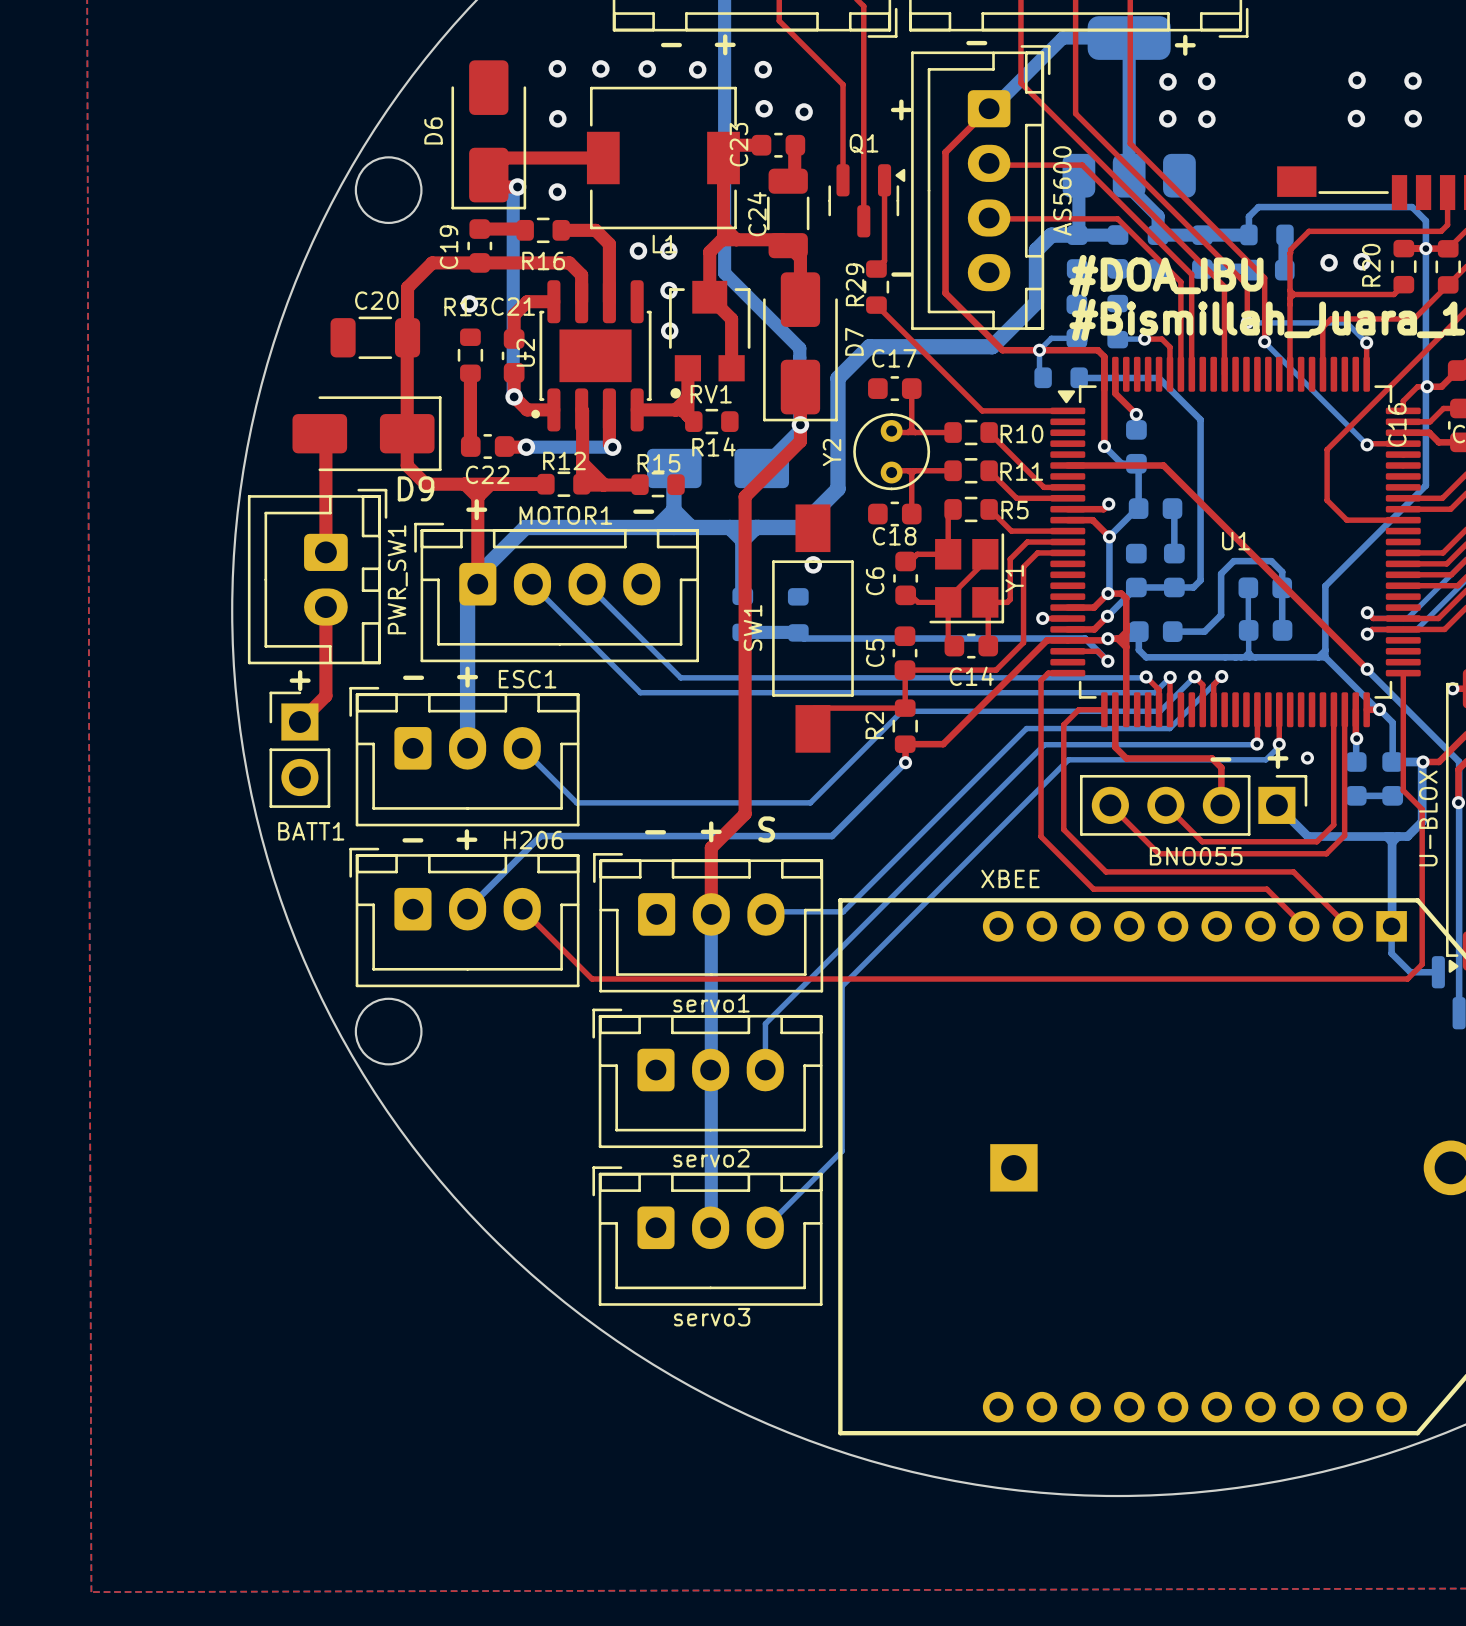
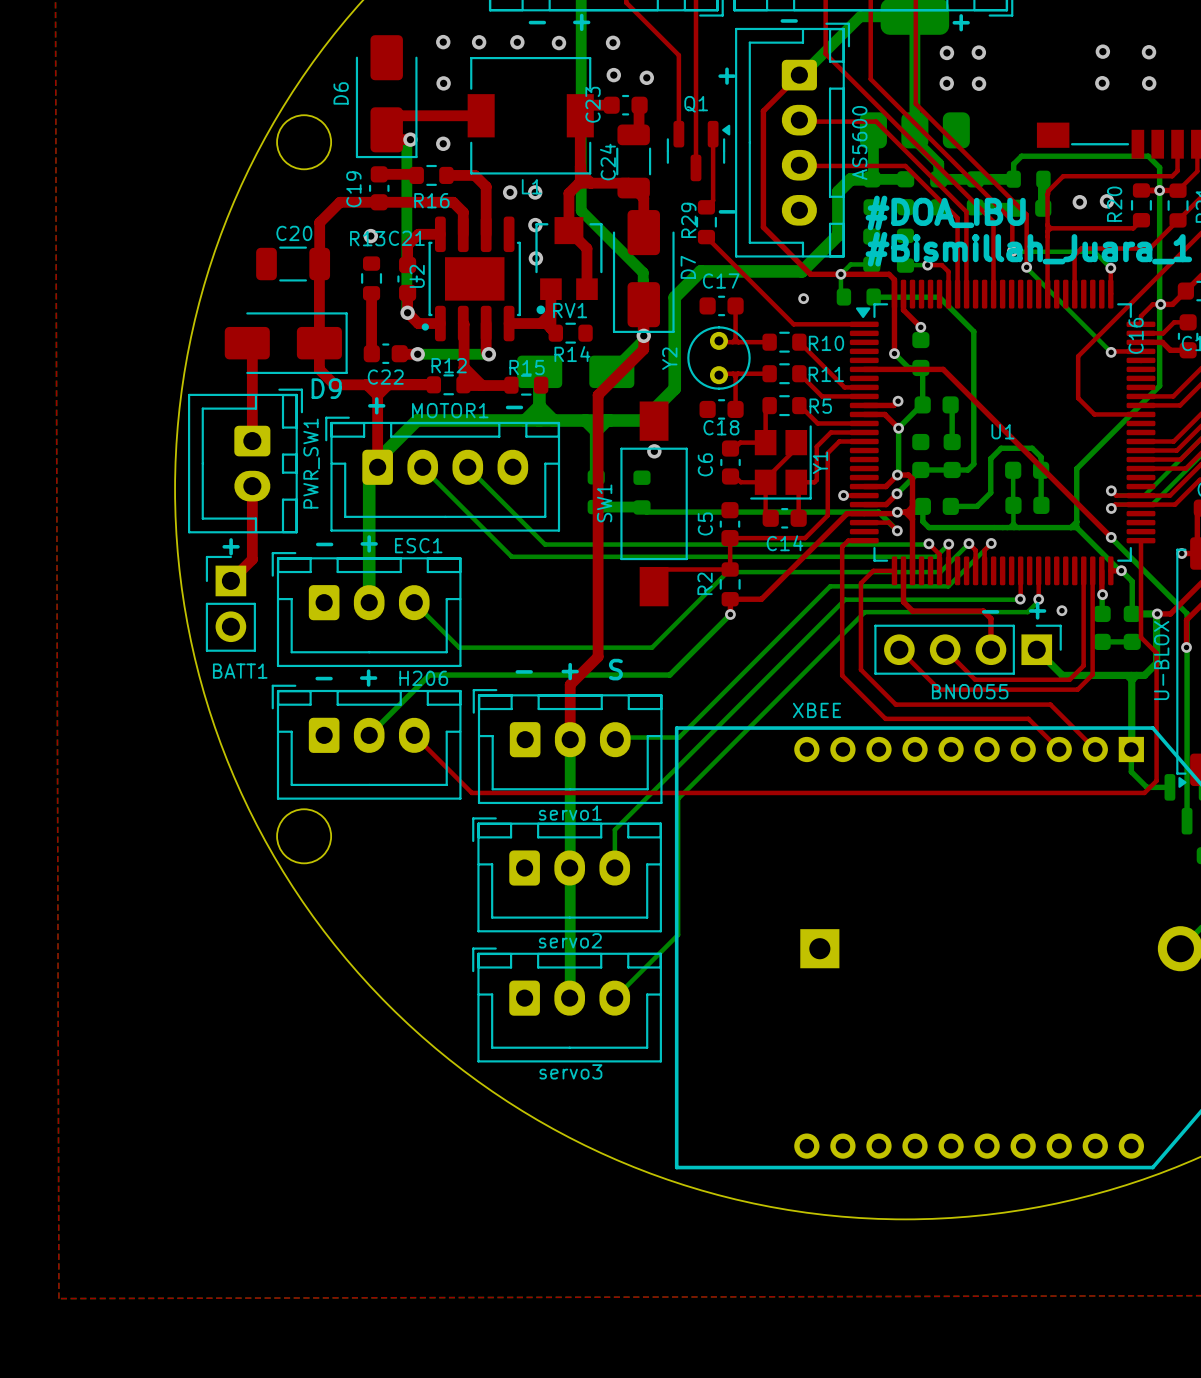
via: none -> (803, 298)

